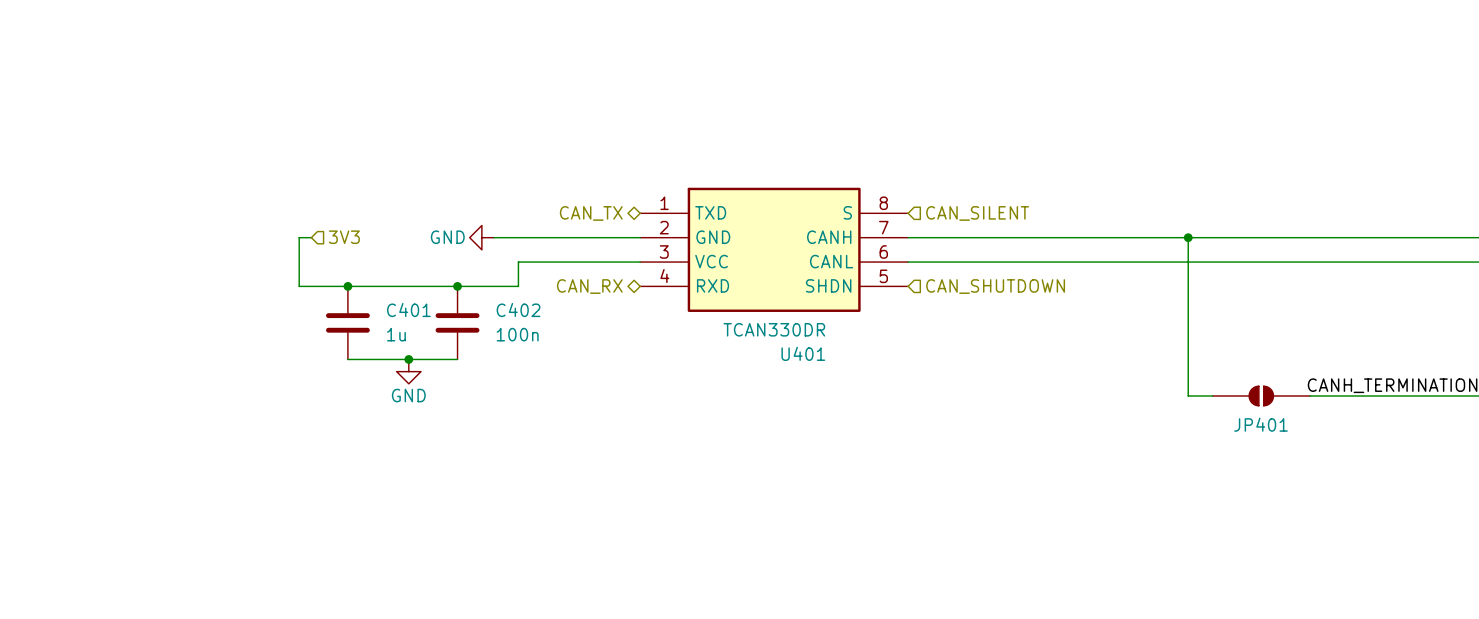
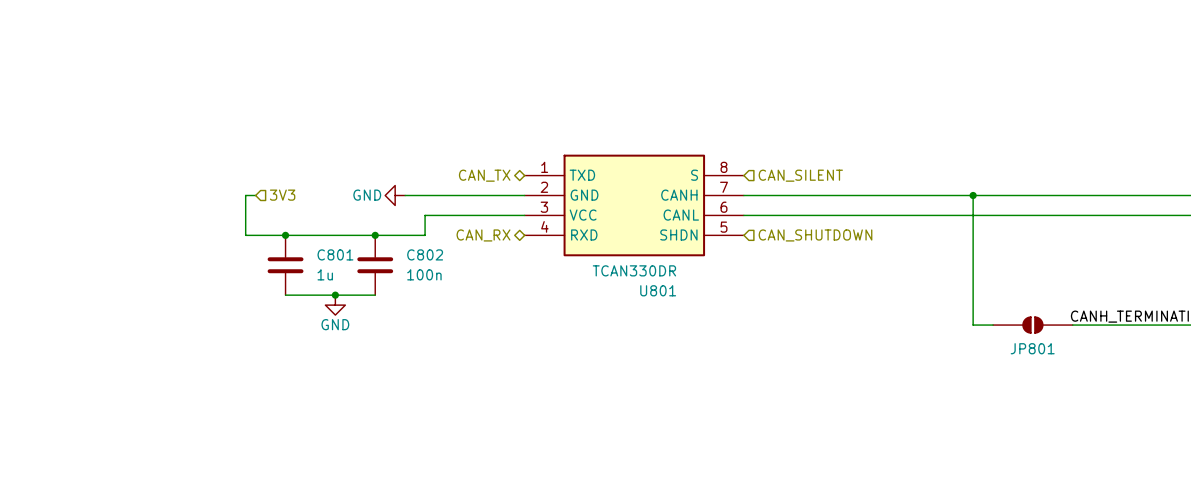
C401 name: C401 (408, 310) -> C801 (335, 254)
C402 name: C402 (518, 310) -> C802 (425, 254)
U401 name: U401 (803, 353) -> U801 (658, 290)
JP401 name: JP401 (1261, 424) -> JP801 (1032, 348)

